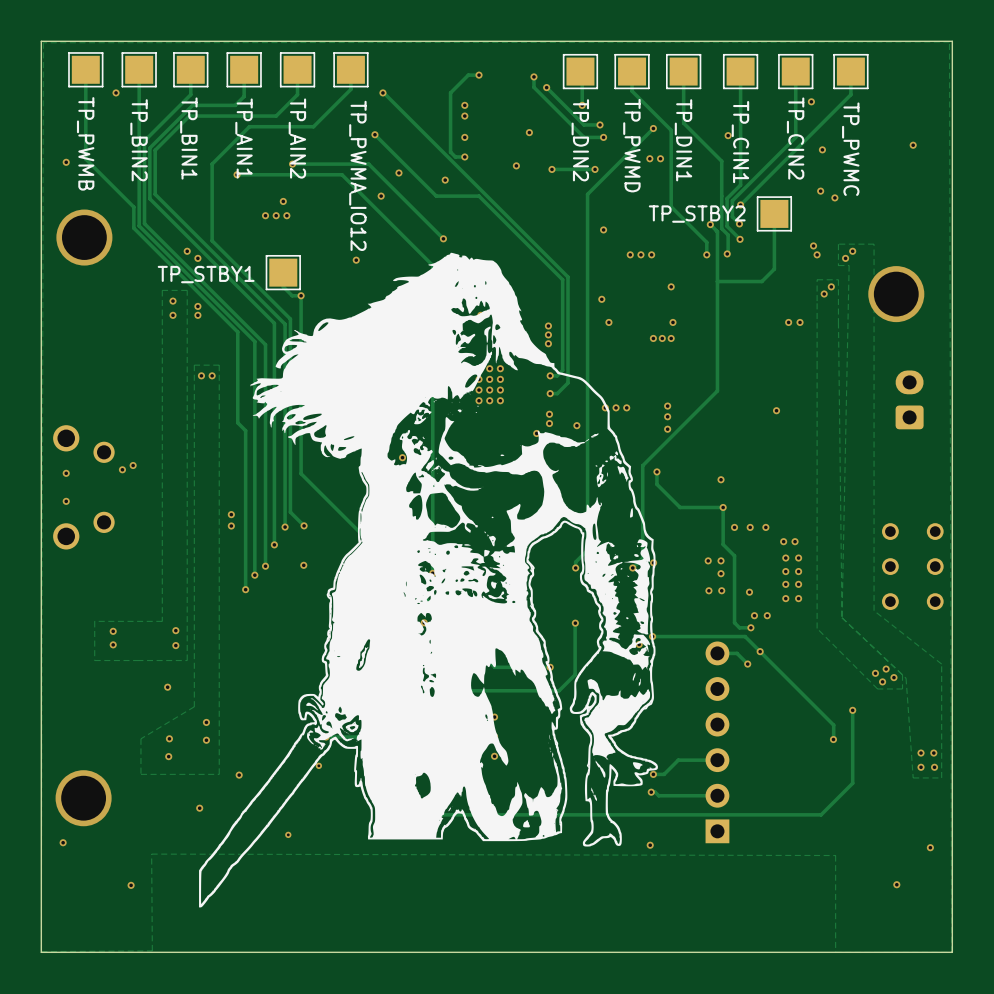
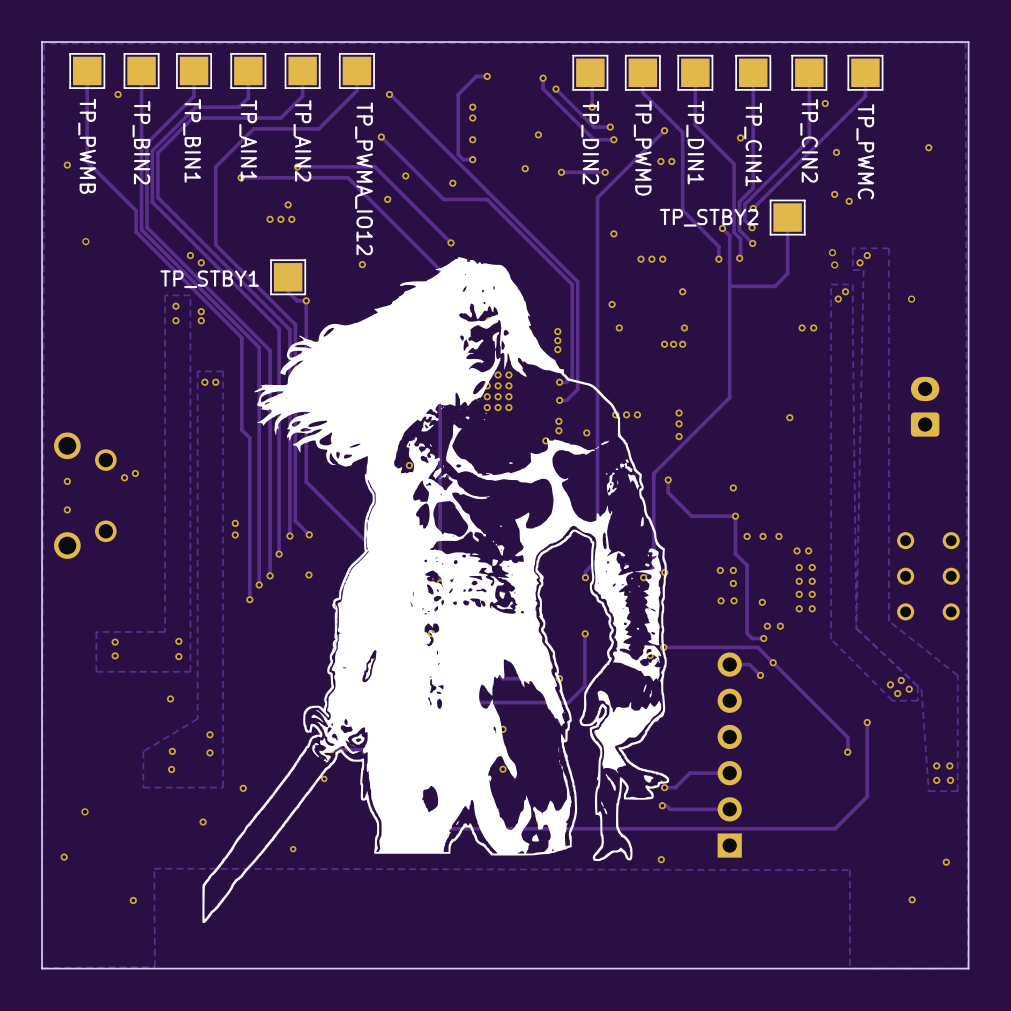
via size: [56, 209, 113, 266] -> [82, 237, 90, 246]
via: (813, 245) -> none
via: none -> (832, 252)
via: (817, 254) -> none
via: none -> (834, 264)
via size: [868, 266, 925, 323] -> [907, 295, 916, 303]
via size: [55, 770, 112, 827] -> [81, 808, 89, 816]

